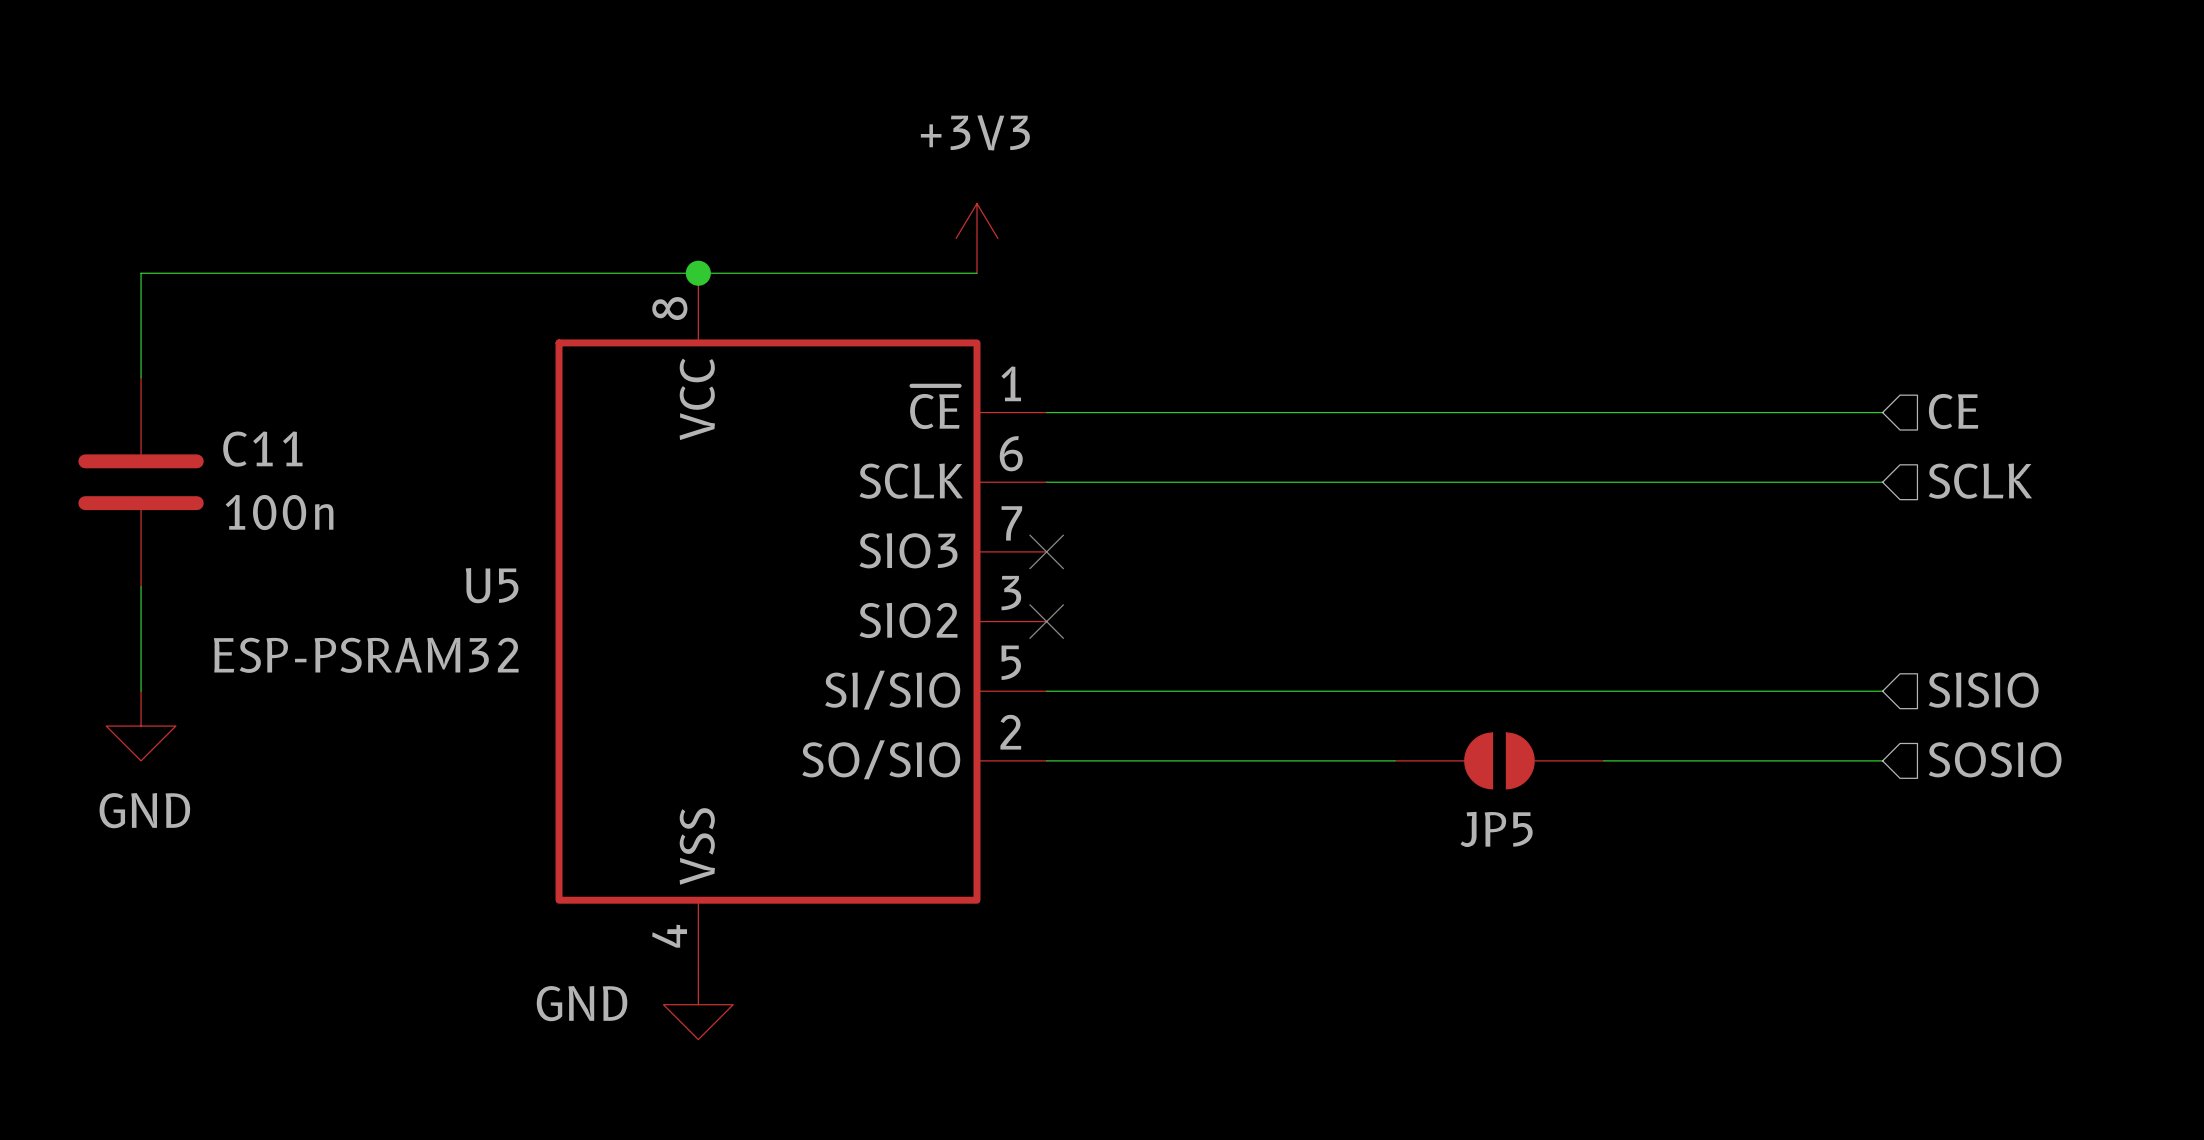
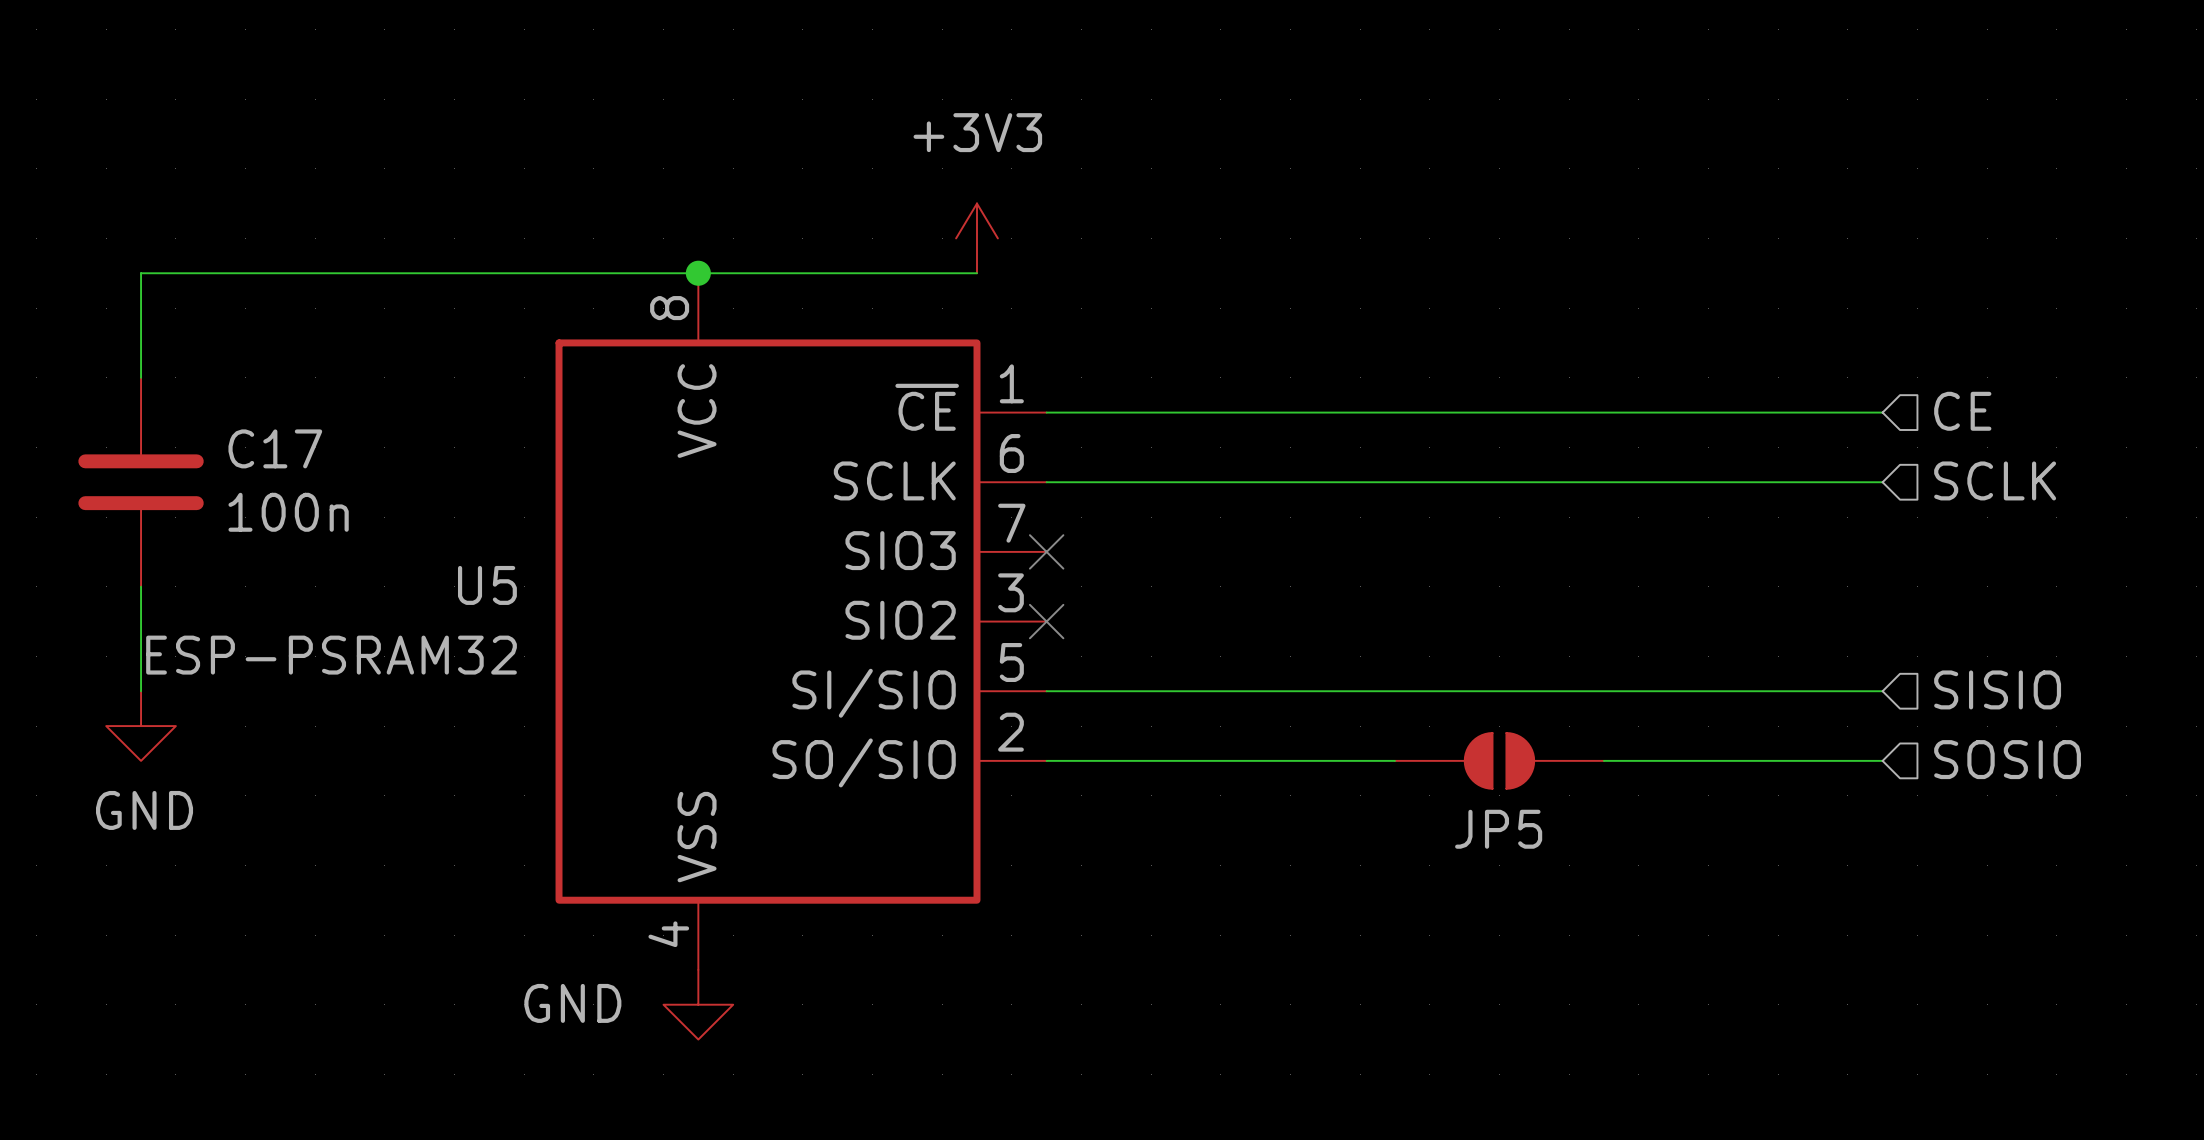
C11 name: C11 (262, 449) -> C17 (275, 448)

